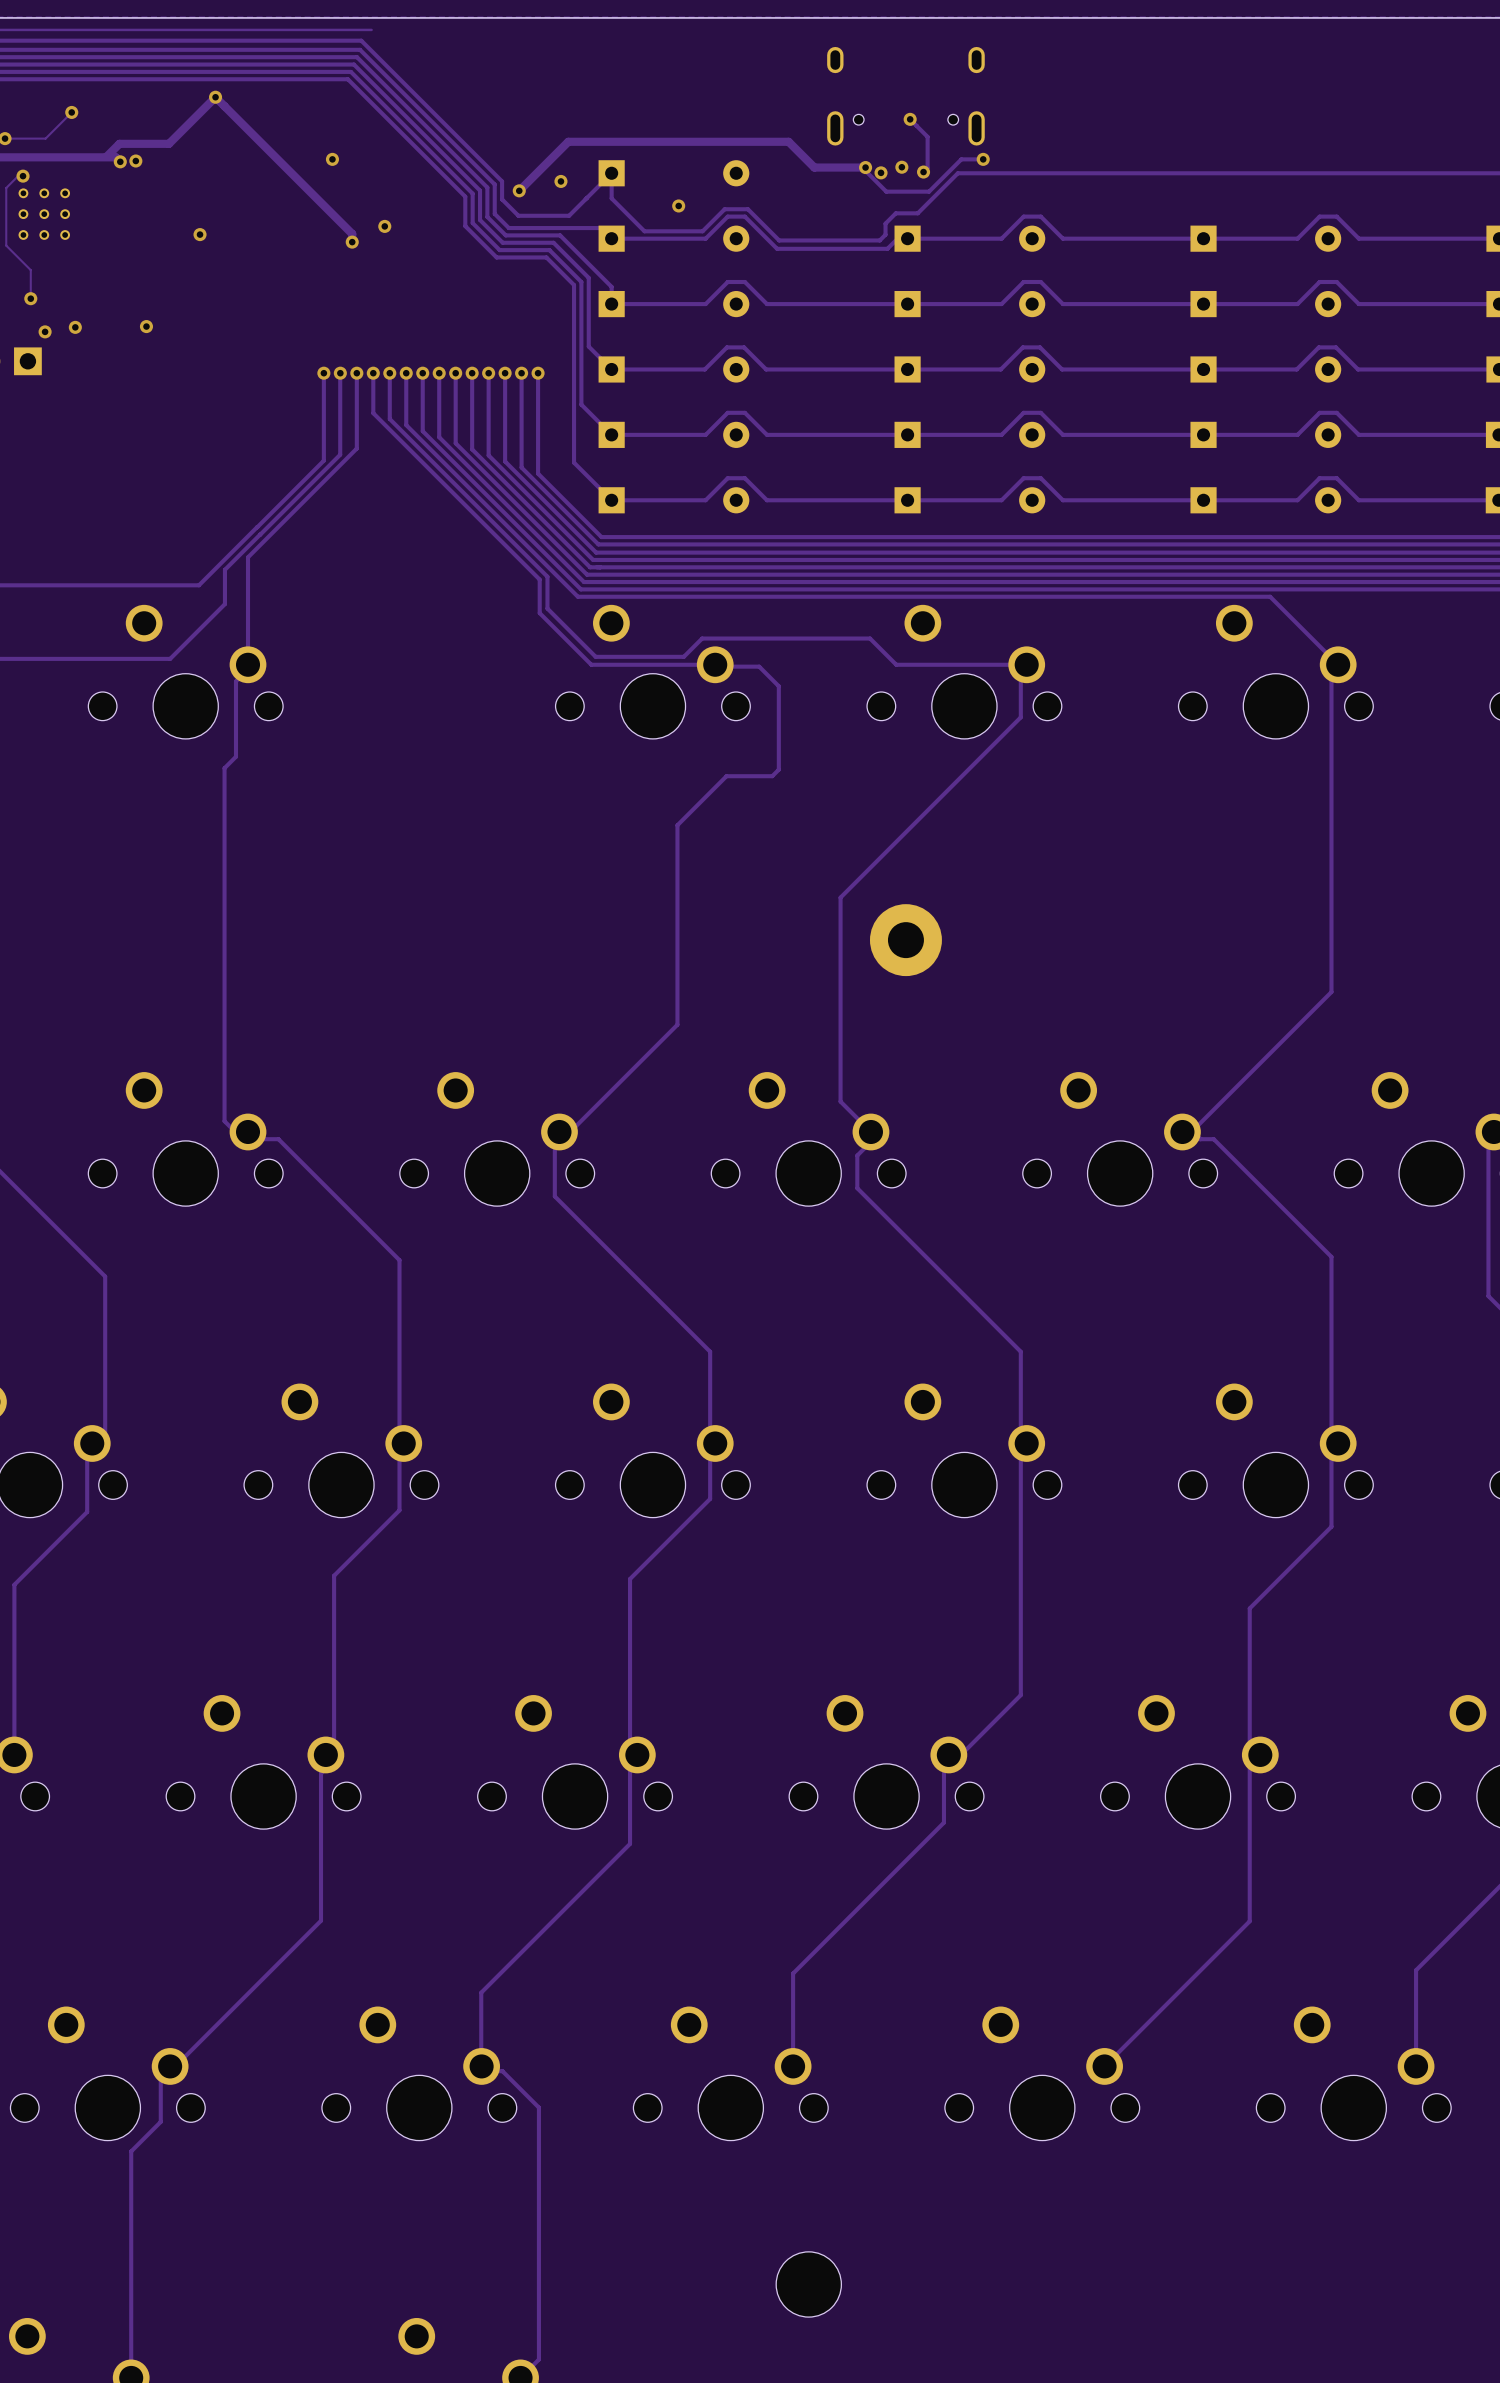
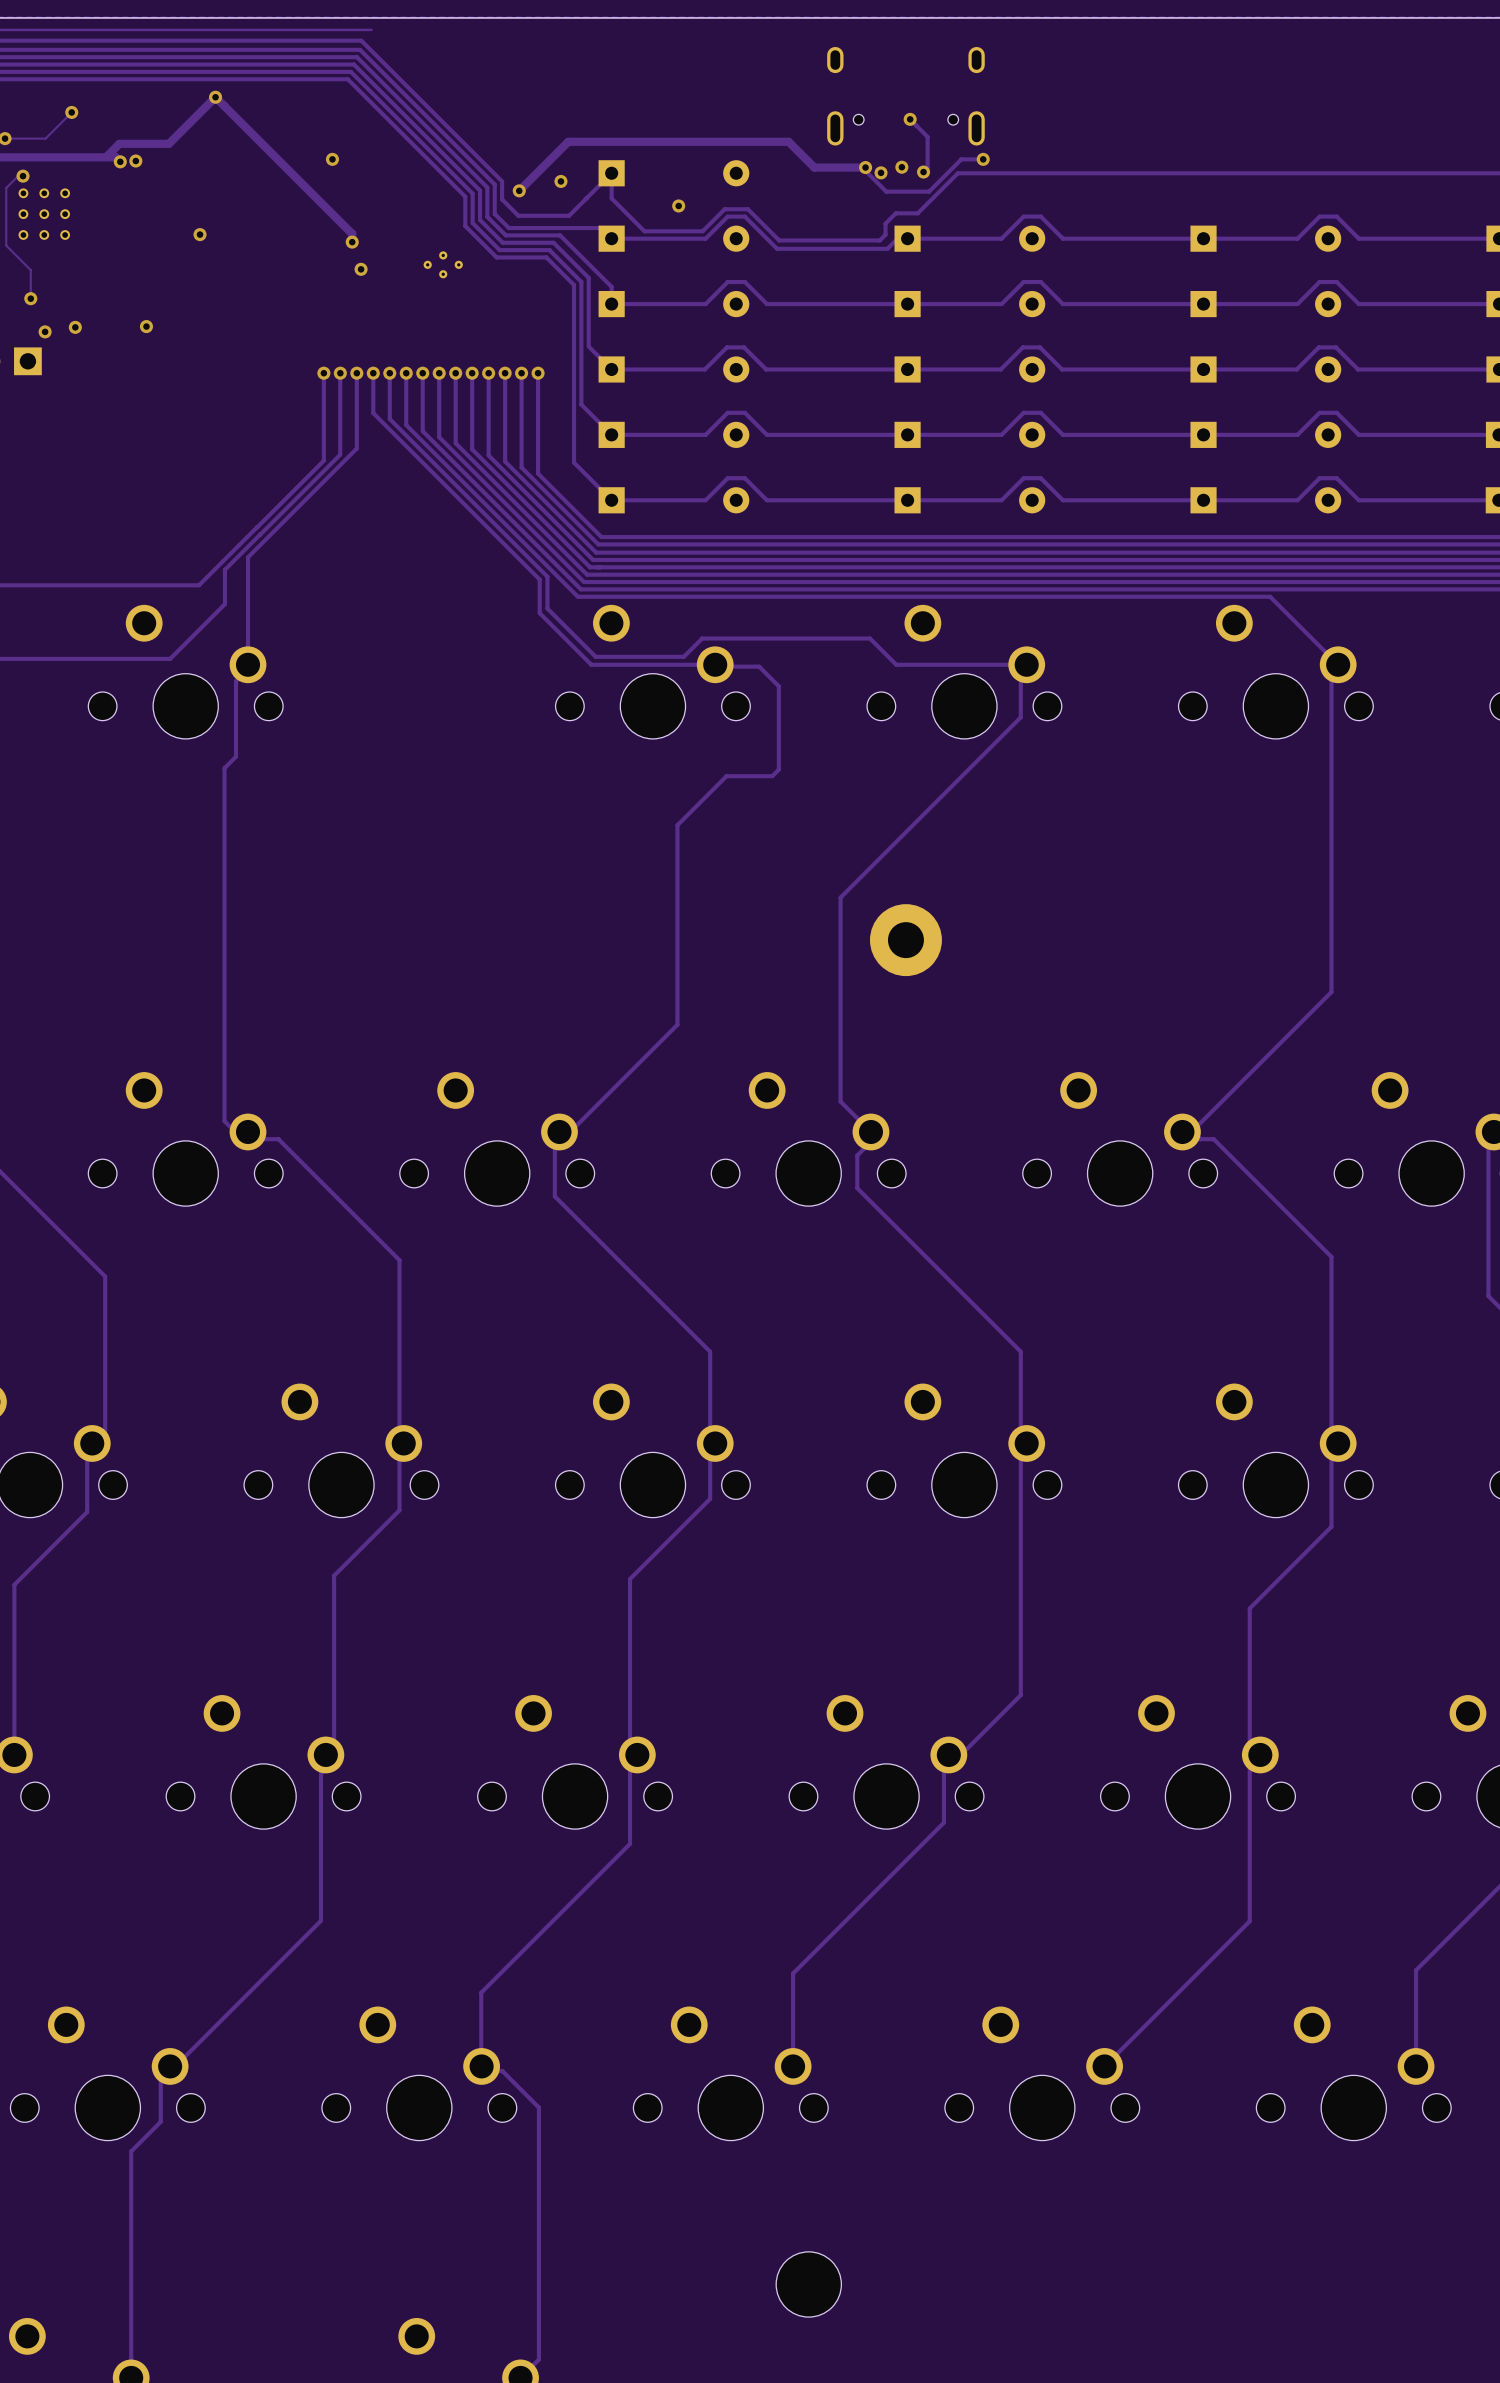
via position: (384, 226) -> (361, 269)
part: none -> (443, 264)

